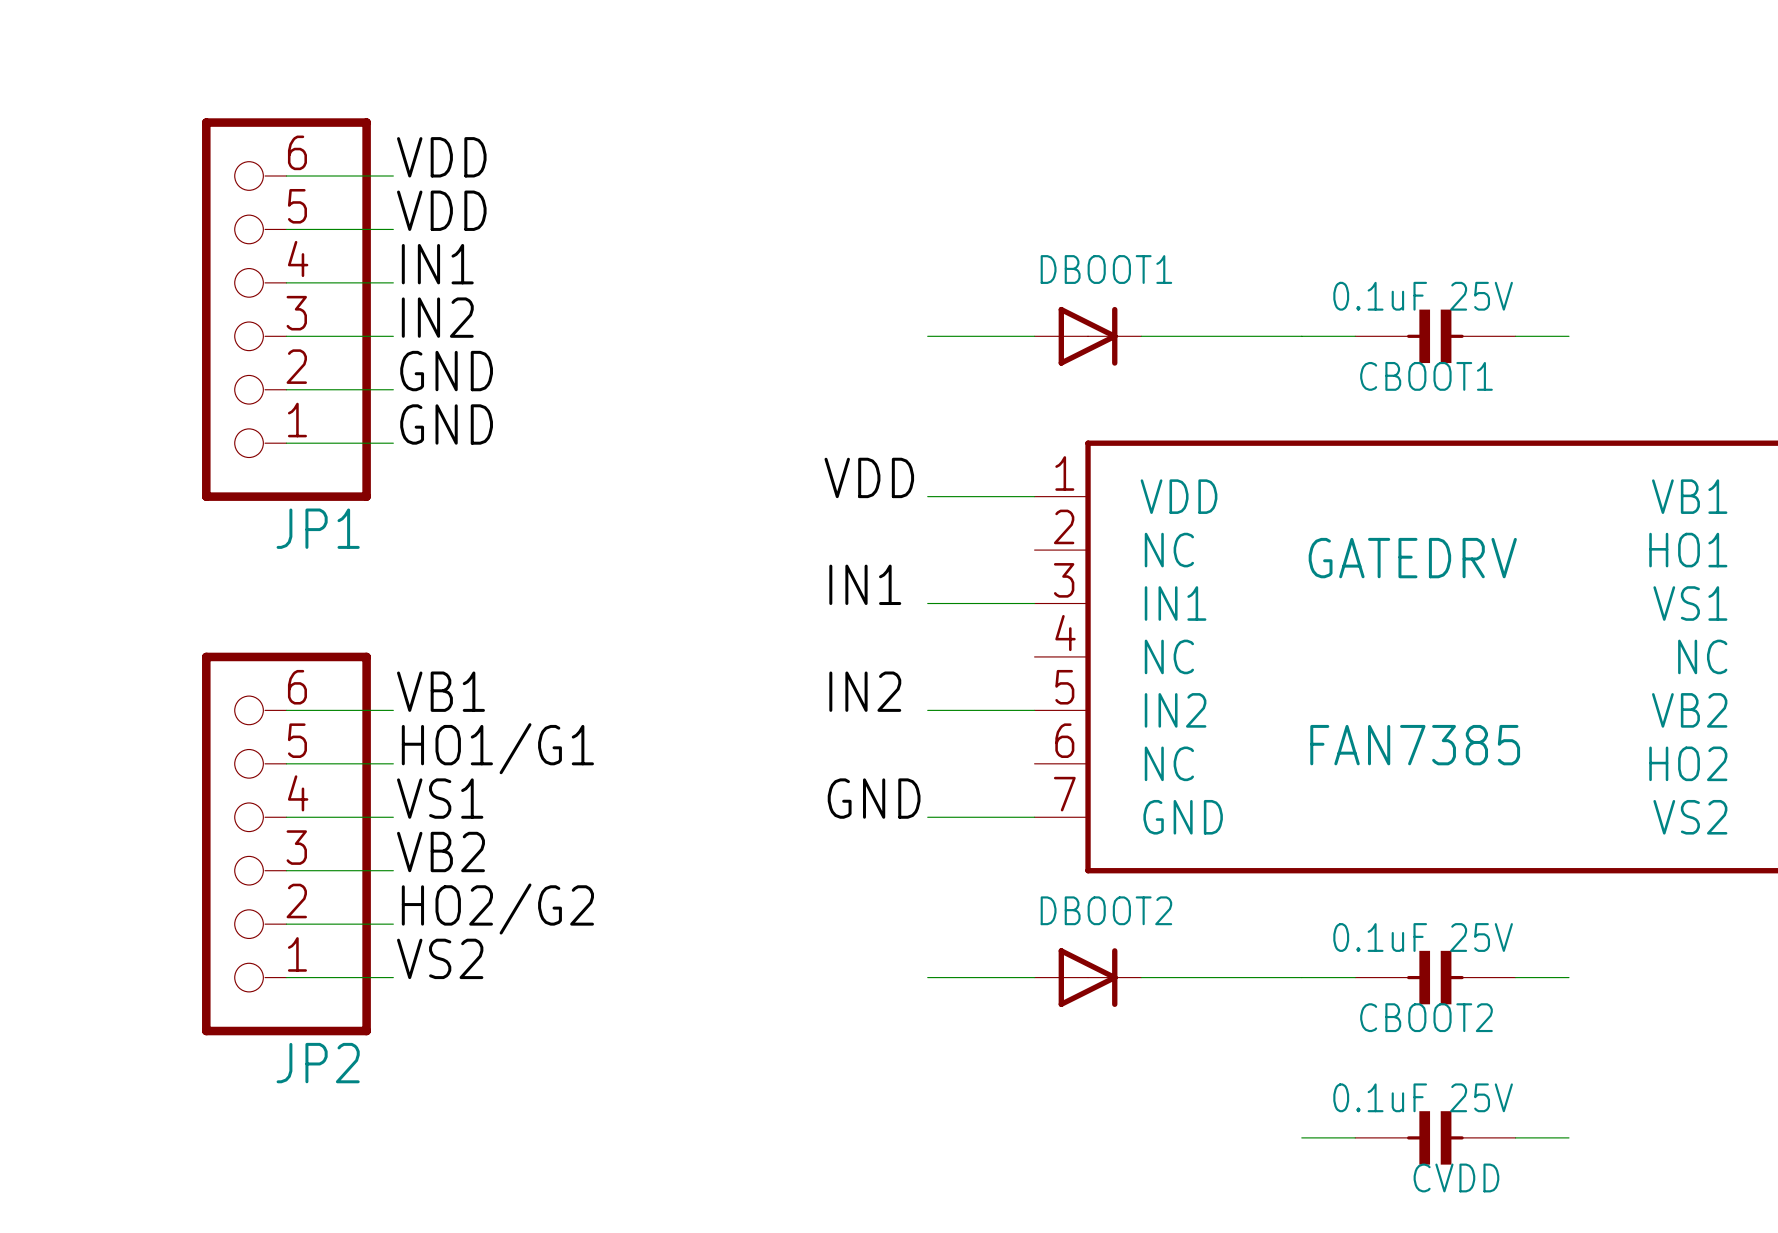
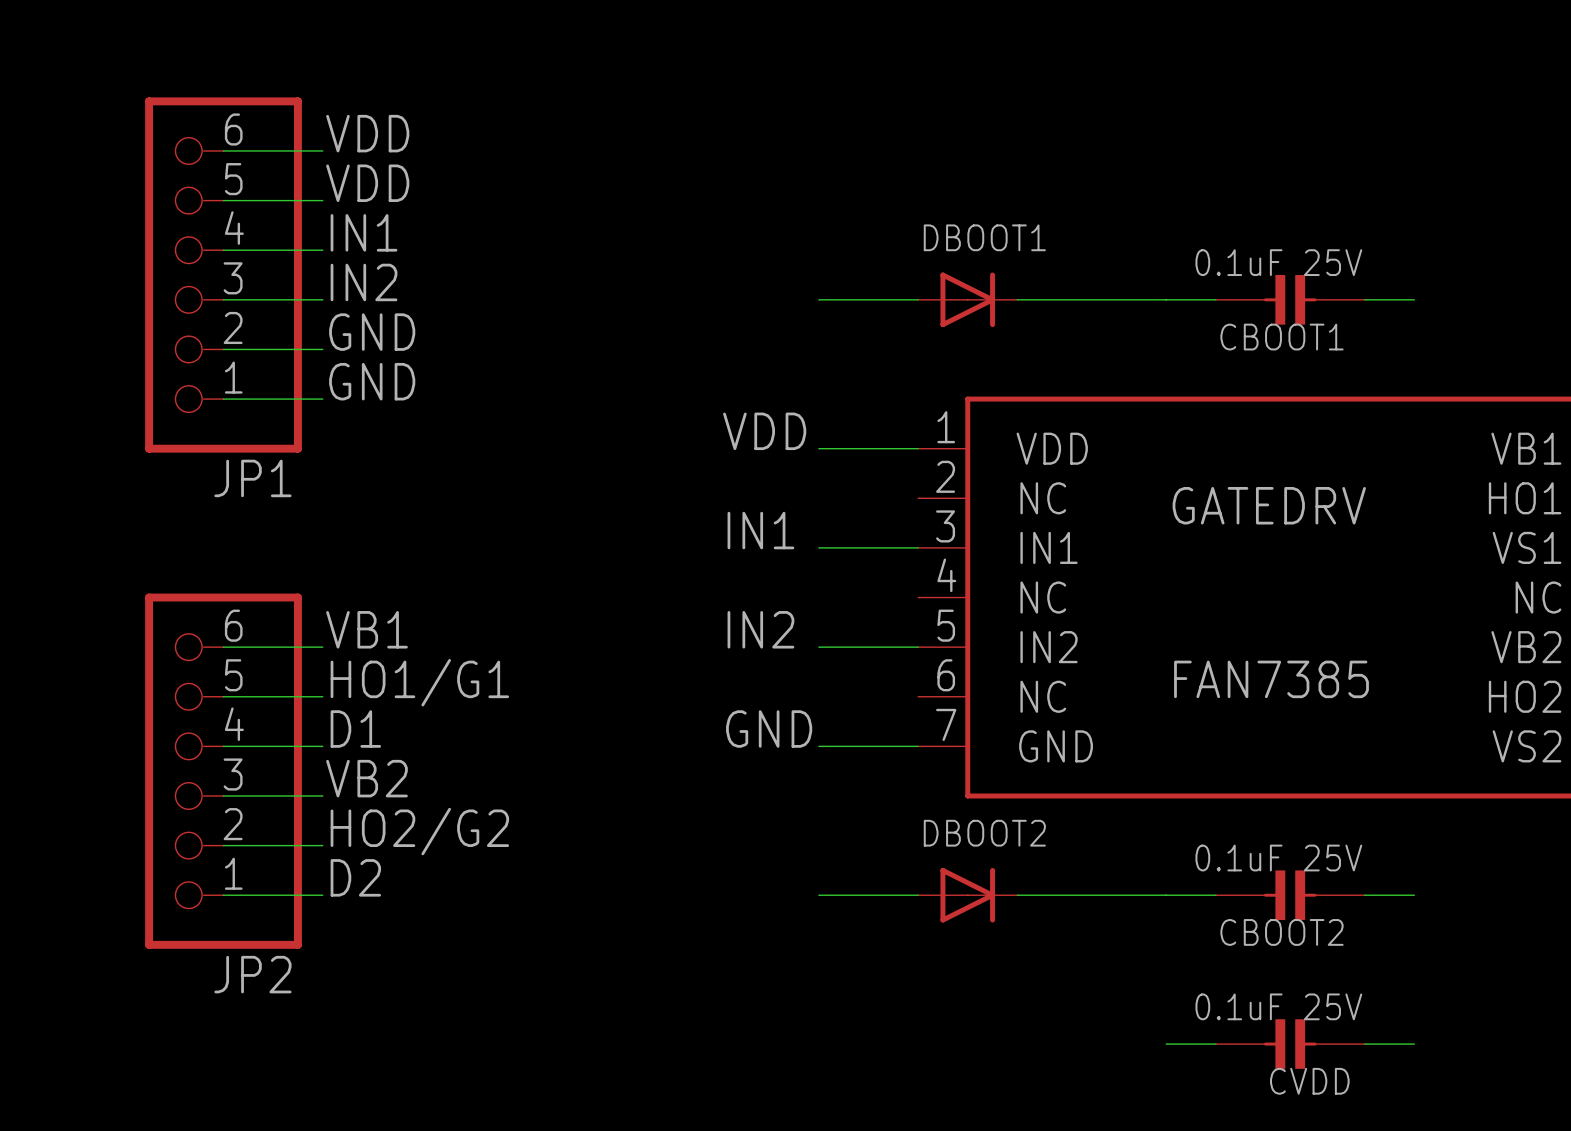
label: VS1 (440, 798) -> D1 (355, 729)
label: VS2 (440, 958) -> D2 (355, 877)

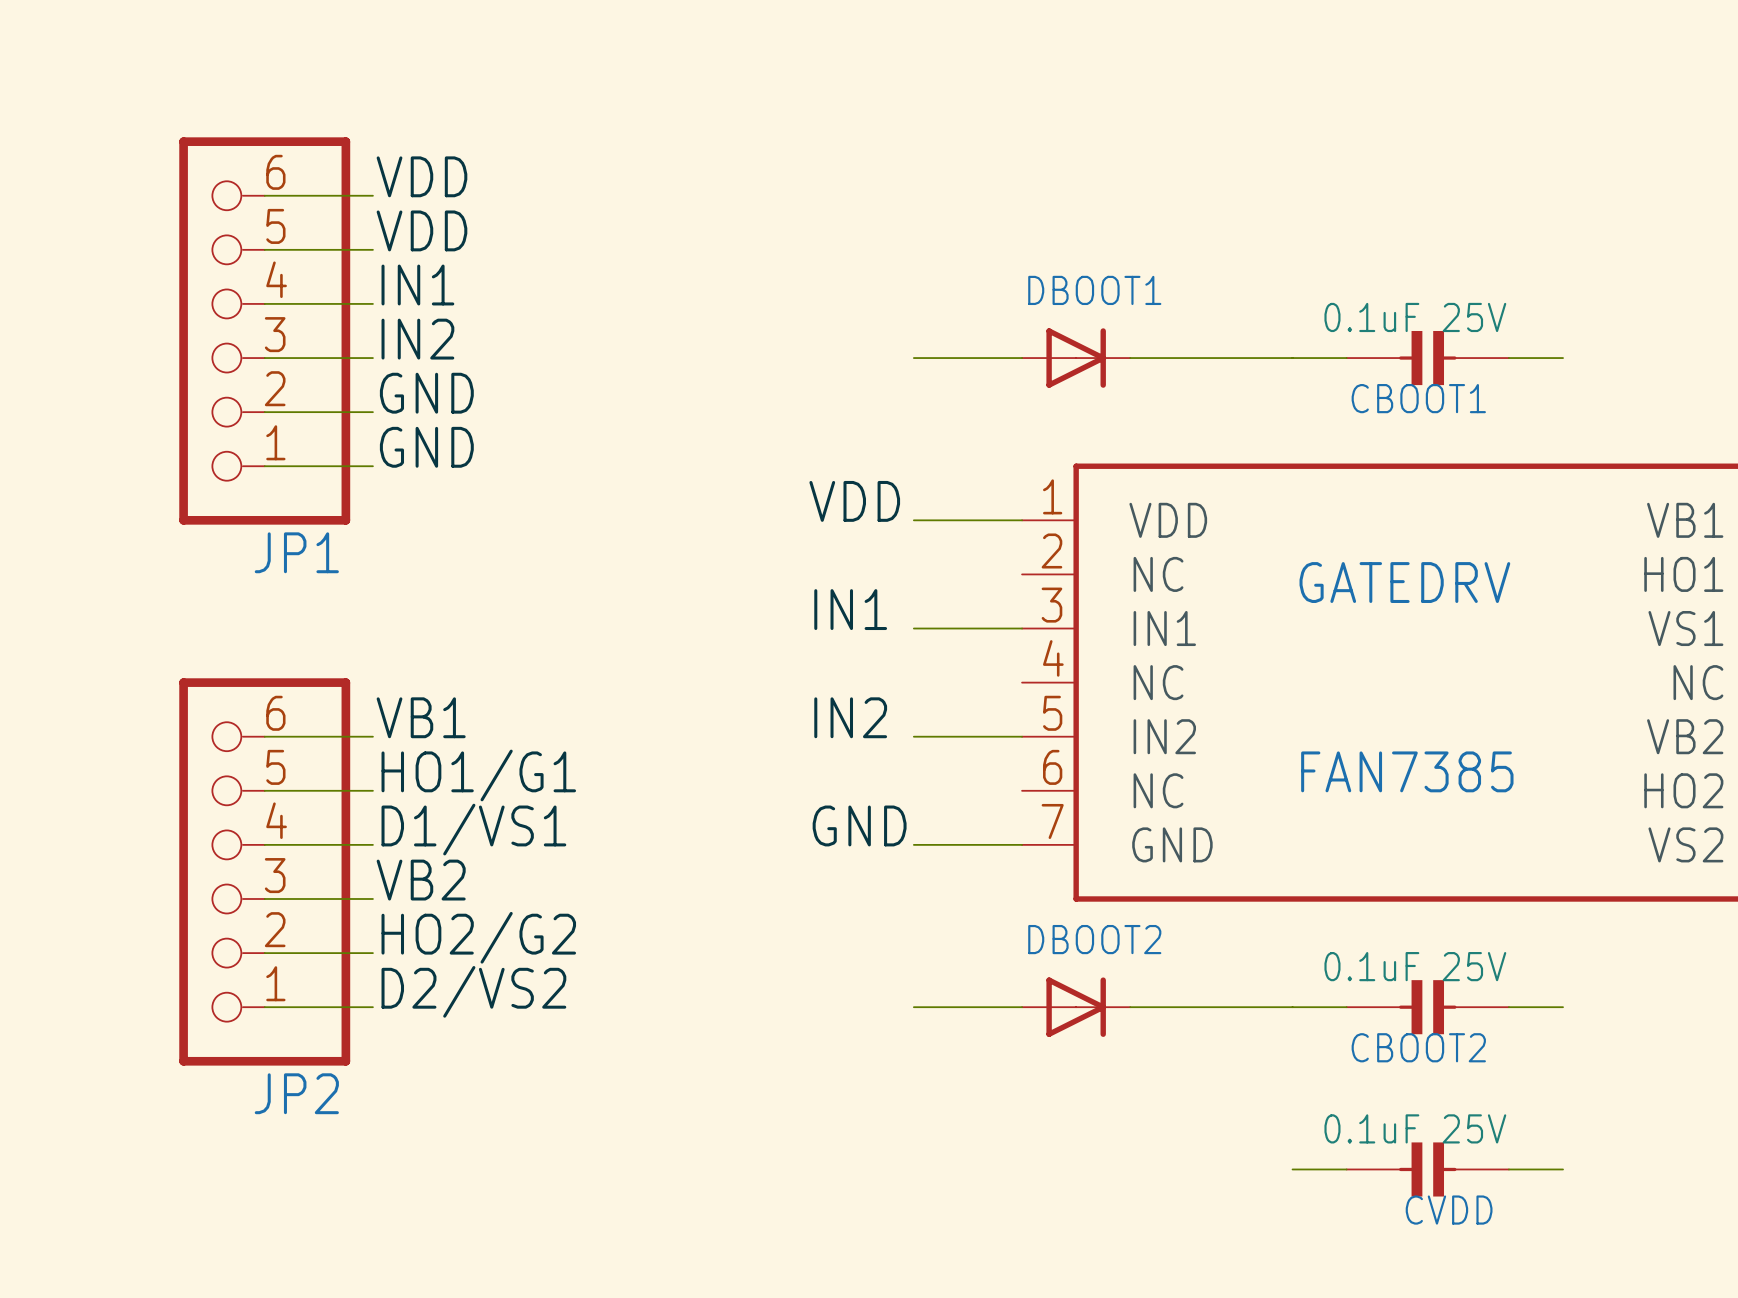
label: D1 (355, 729) -> D1/VS1 (473, 829)
label: D2 (355, 877) -> D2/VS2 (473, 991)

